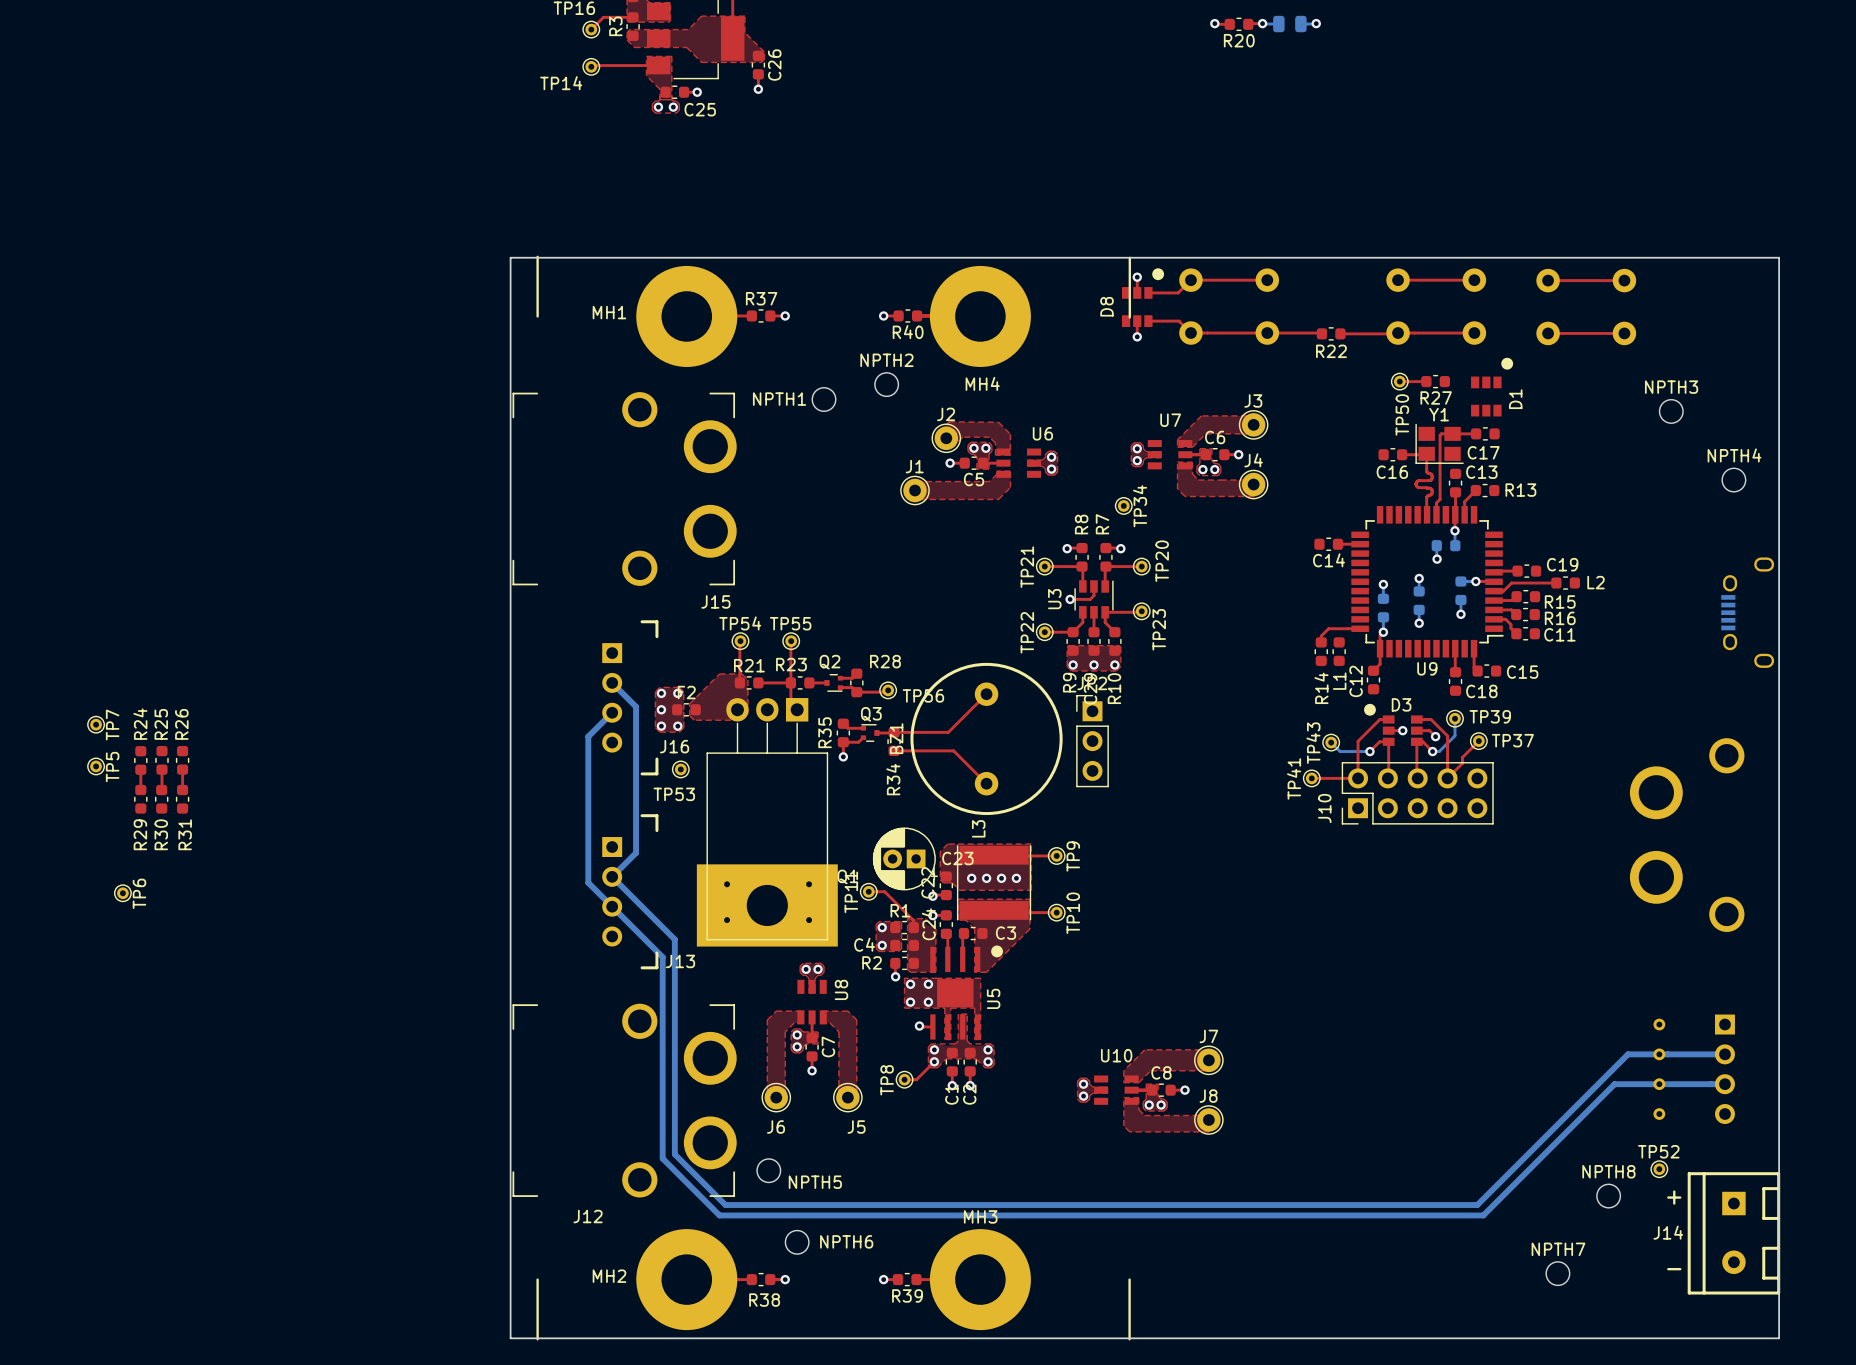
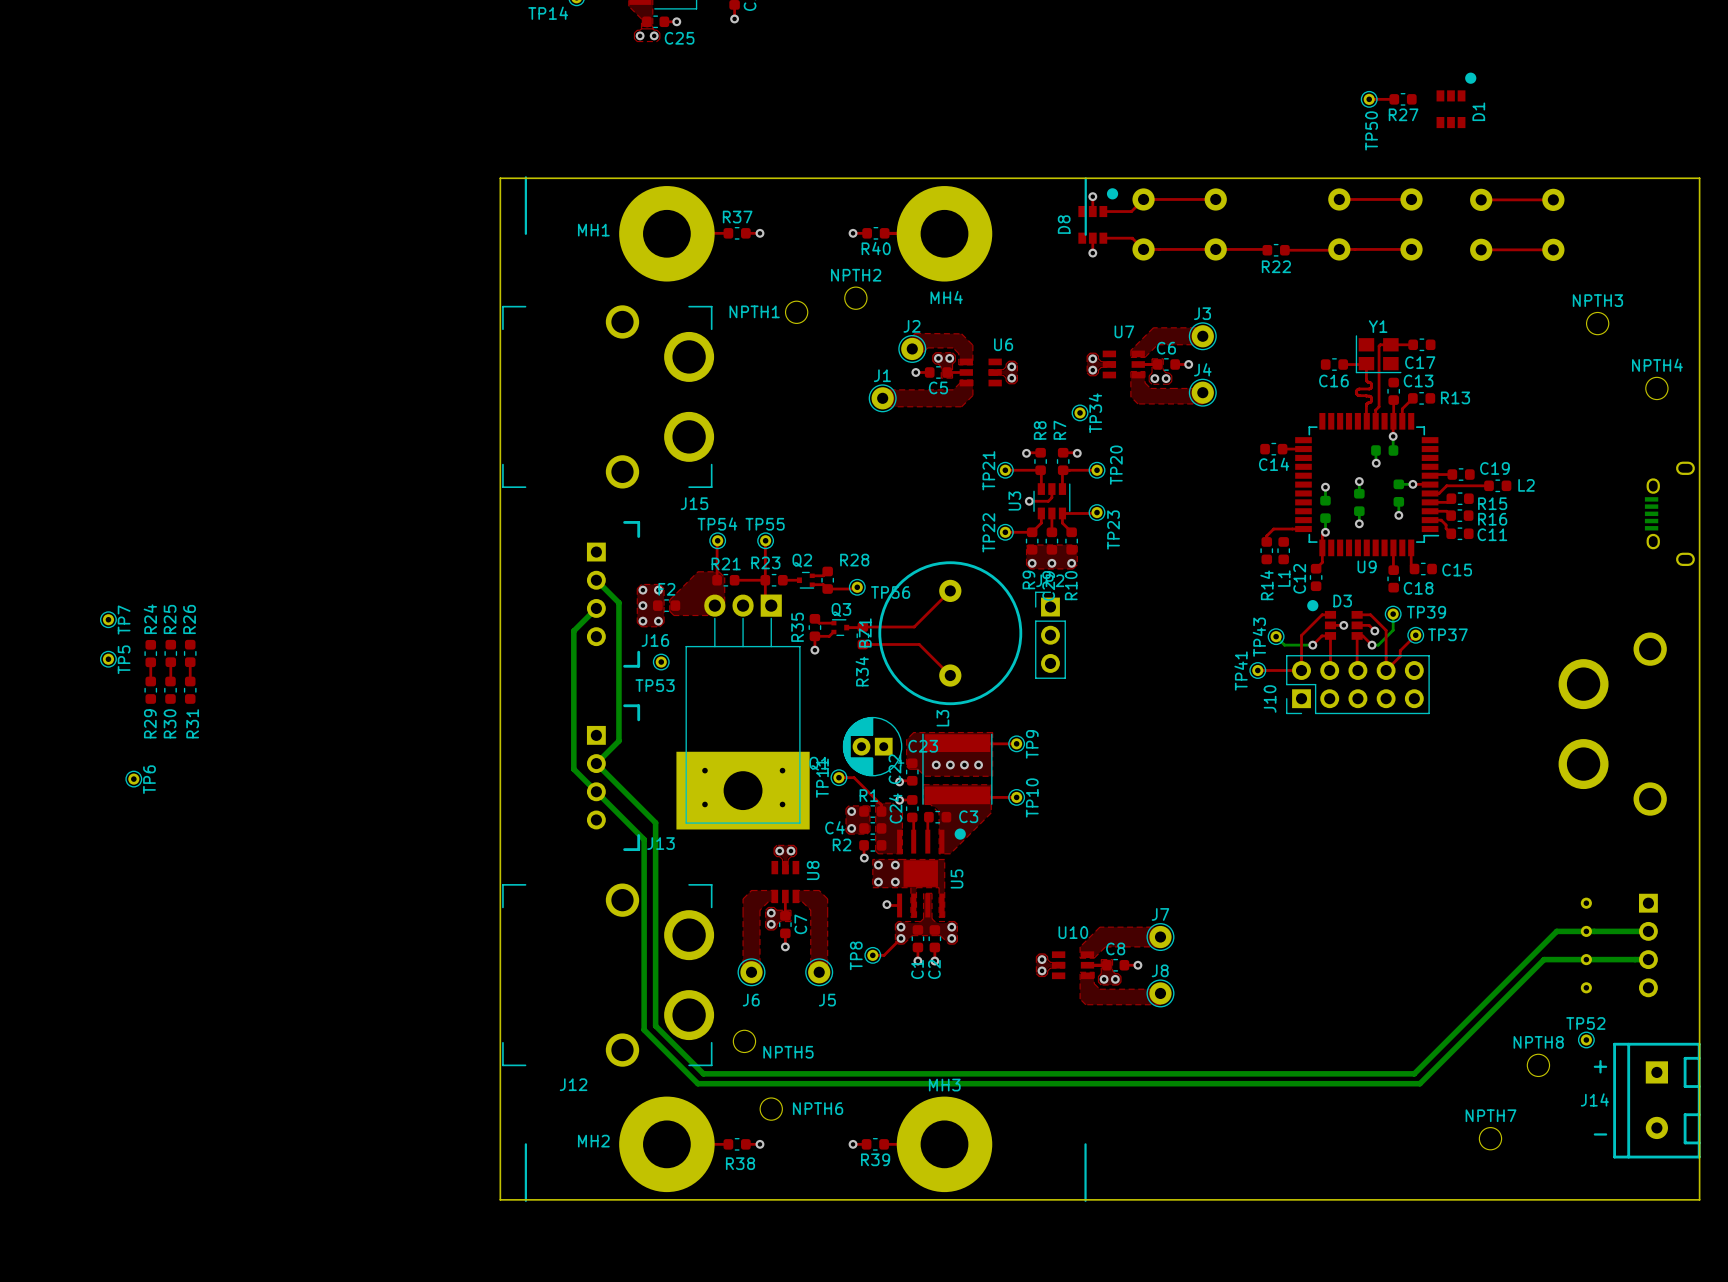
top track: (1399, 381) (1426, 381) -> (1369, 99) (1394, 99)
TP50 position: (1399, 381) -> (1369, 99)
R27 position: (1435, 381) -> (1403, 99)
D1 position: (1492, 387) -> (1456, 100)

